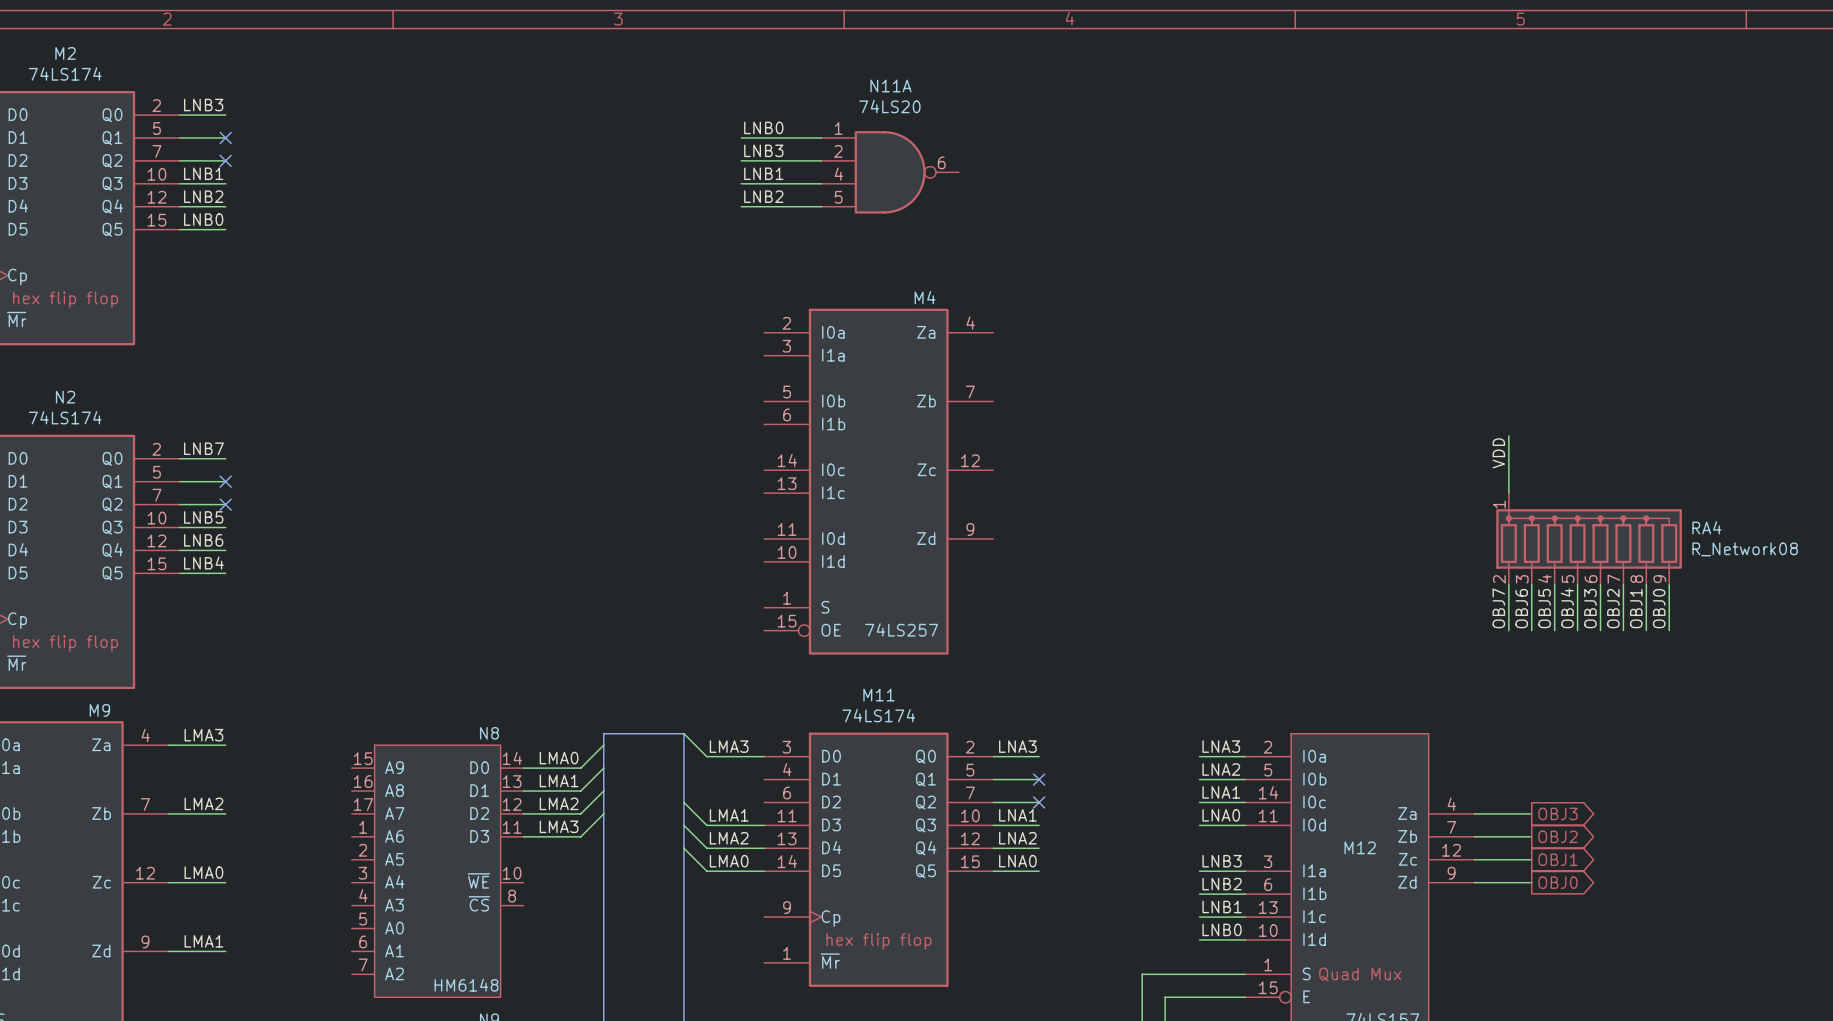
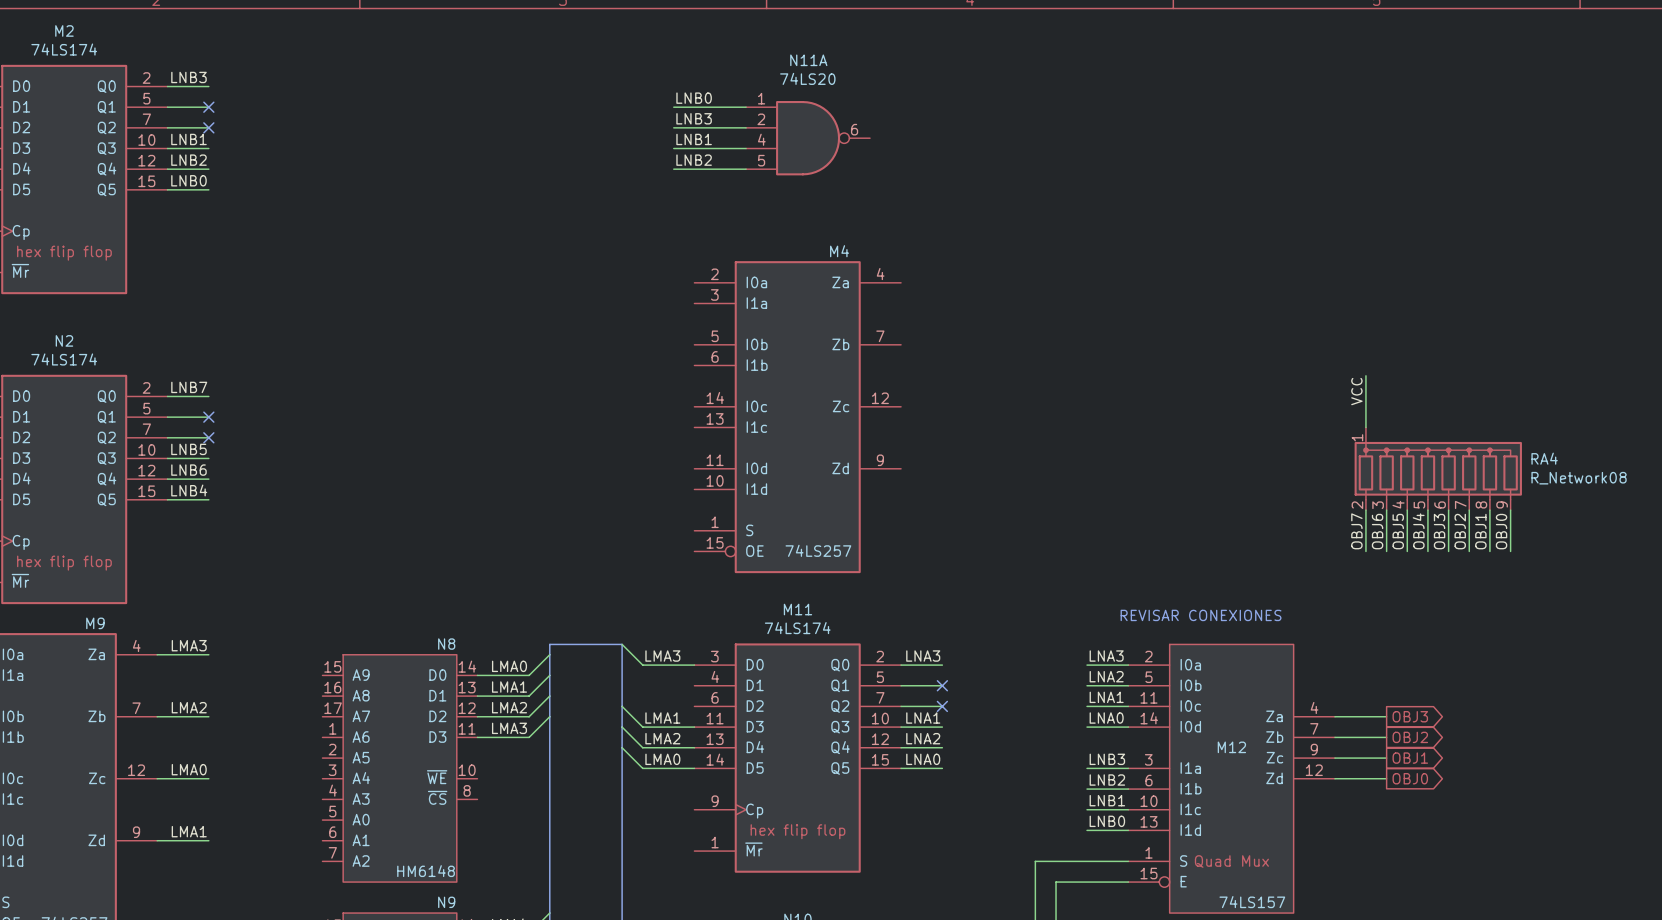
label: VDD (1498, 453) -> VCC (1356, 391)
text: none -> REVISAR CONEXIONES (1201, 615)
M12 pin number: 14 (1268, 792) -> 11 (1149, 697)
M12 pin number: 11 (1268, 815) -> 14 (1149, 718)
M12 pin number: 12 (1451, 850) -> 9 (1314, 749)
M12 pin number: 9 (1451, 873) -> 12 (1314, 770)
M12 pin number: 13 (1268, 907) -> 10 (1149, 801)
M12 pin number: 10 (1268, 930) -> 13 (1149, 821)

